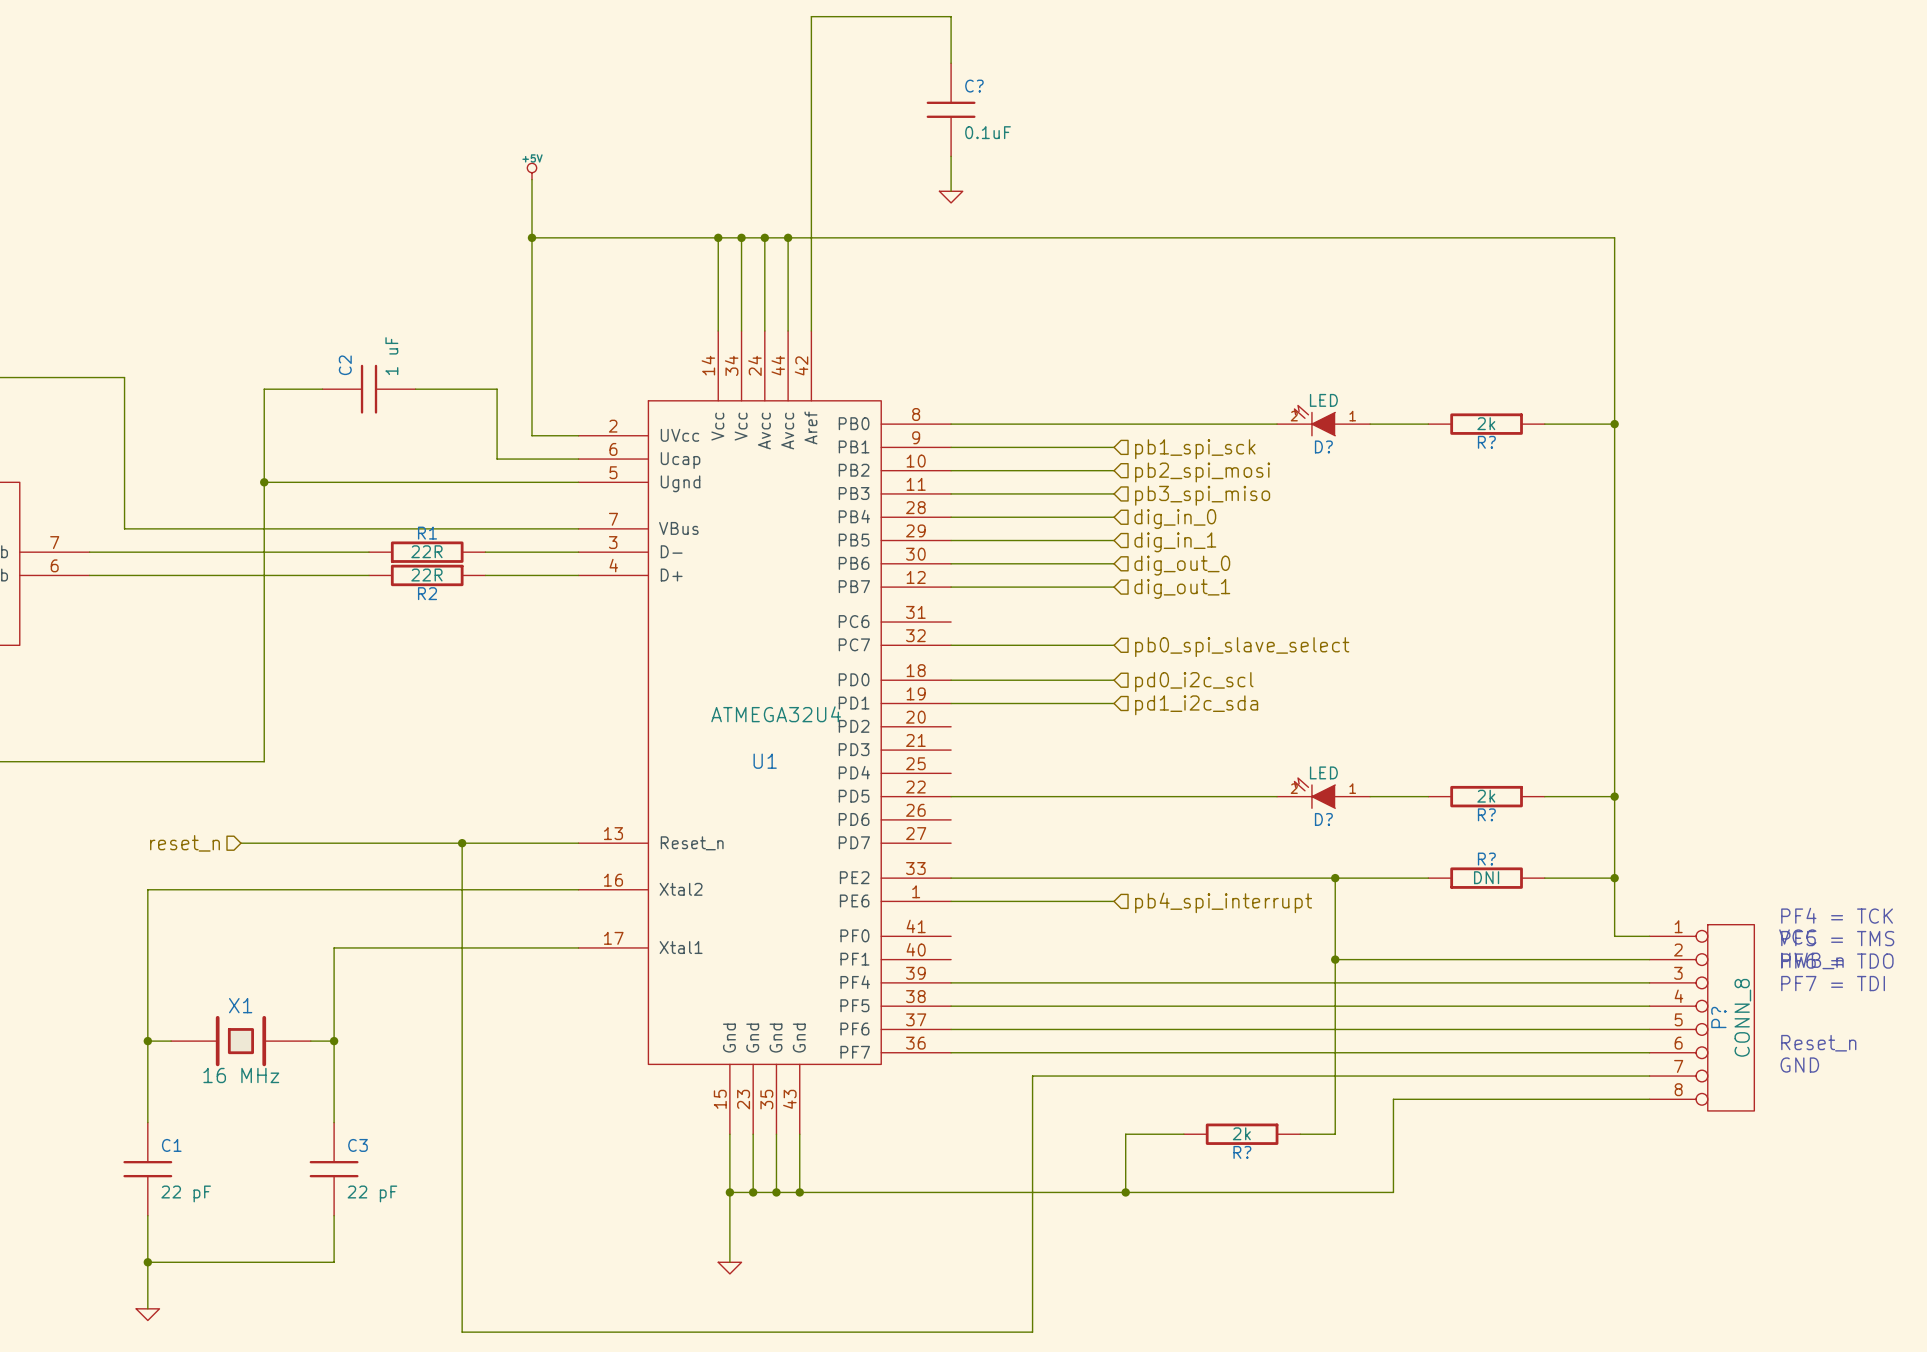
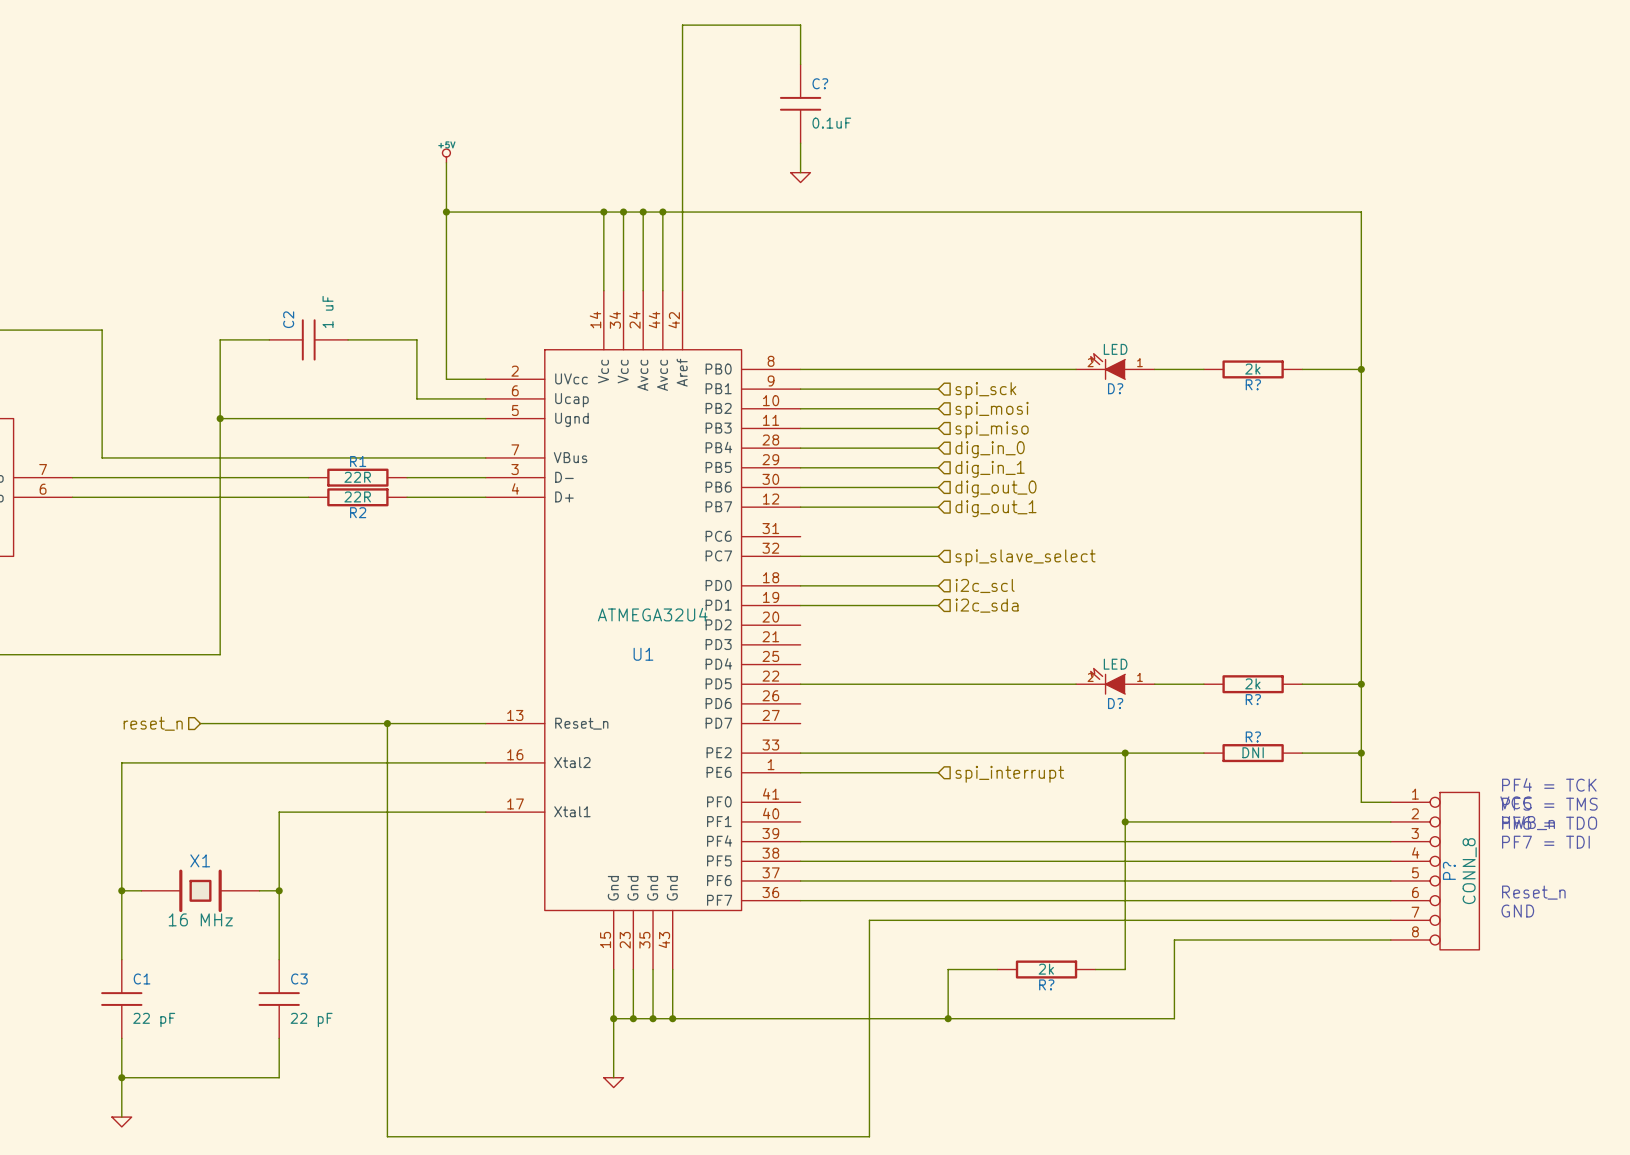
hierarchical label: pb1_spi_sck (1195, 449) -> spi_sck (985, 390)
hierarchical label: pb2_spi_mosi (1202, 472) -> spi_mosi (992, 410)
hierarchical label: pb3_spi_miso (1202, 495) -> spi_miso (992, 429)
hierarchical label: pb0_spi_slave_select (1242, 647) -> spi_slave_select (1025, 557)
hierarchical label: pd0_i2c_scl (1194, 682) -> i2c_scl (985, 585)
hierarchical label: pd1_i2c_sda (1196, 705) -> i2c_sda (987, 605)
hierarchical label: pb4_spi_interrupt (1223, 902) -> spi_interrupt (1009, 774)

